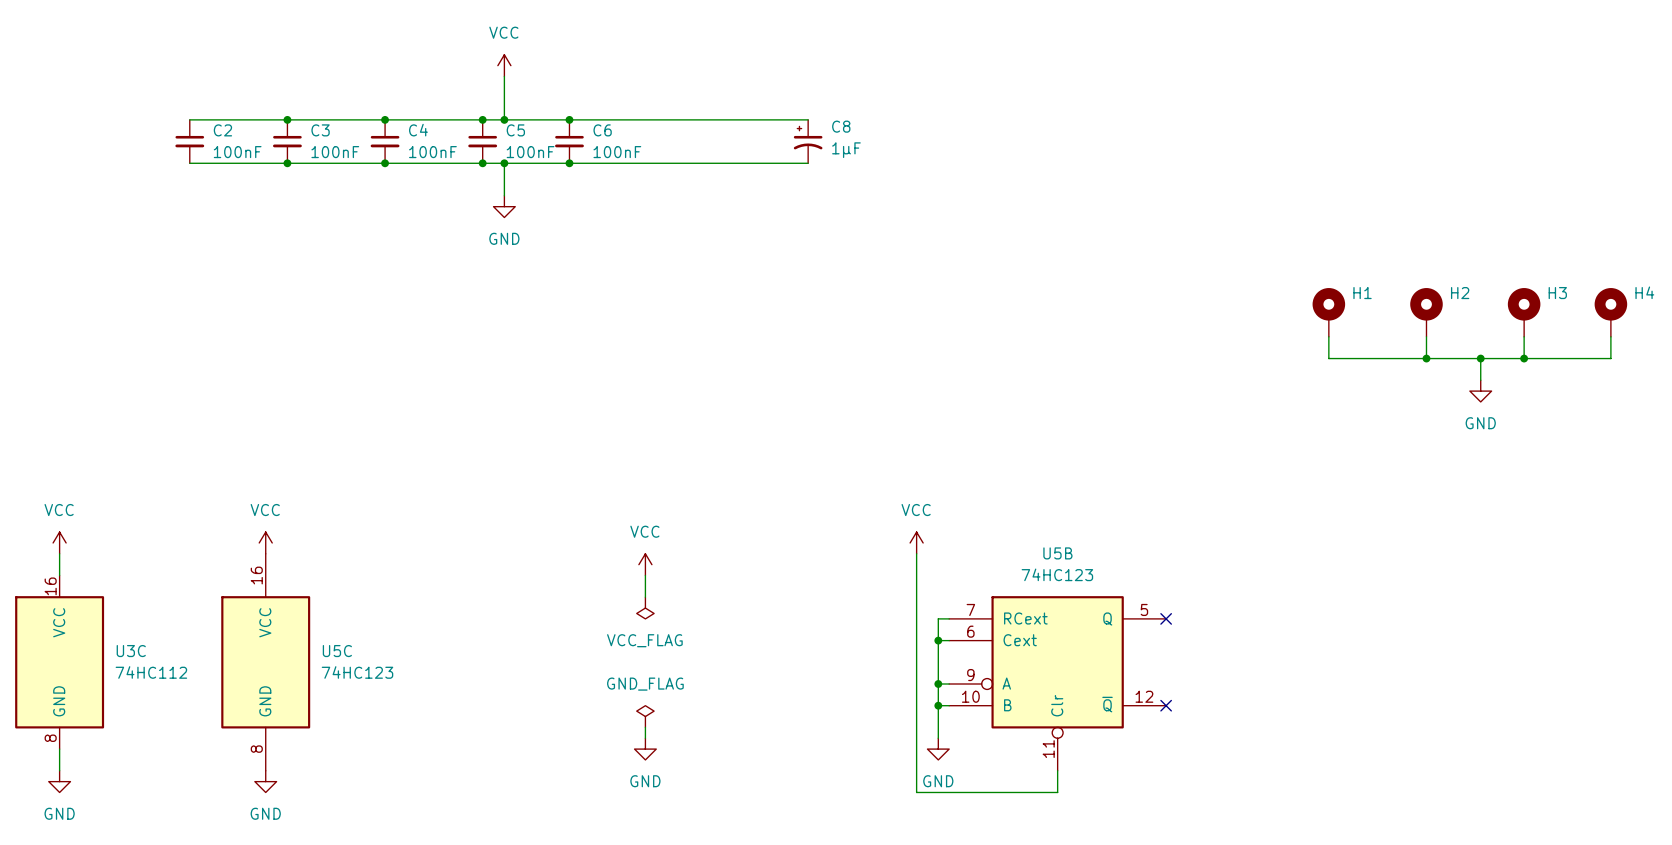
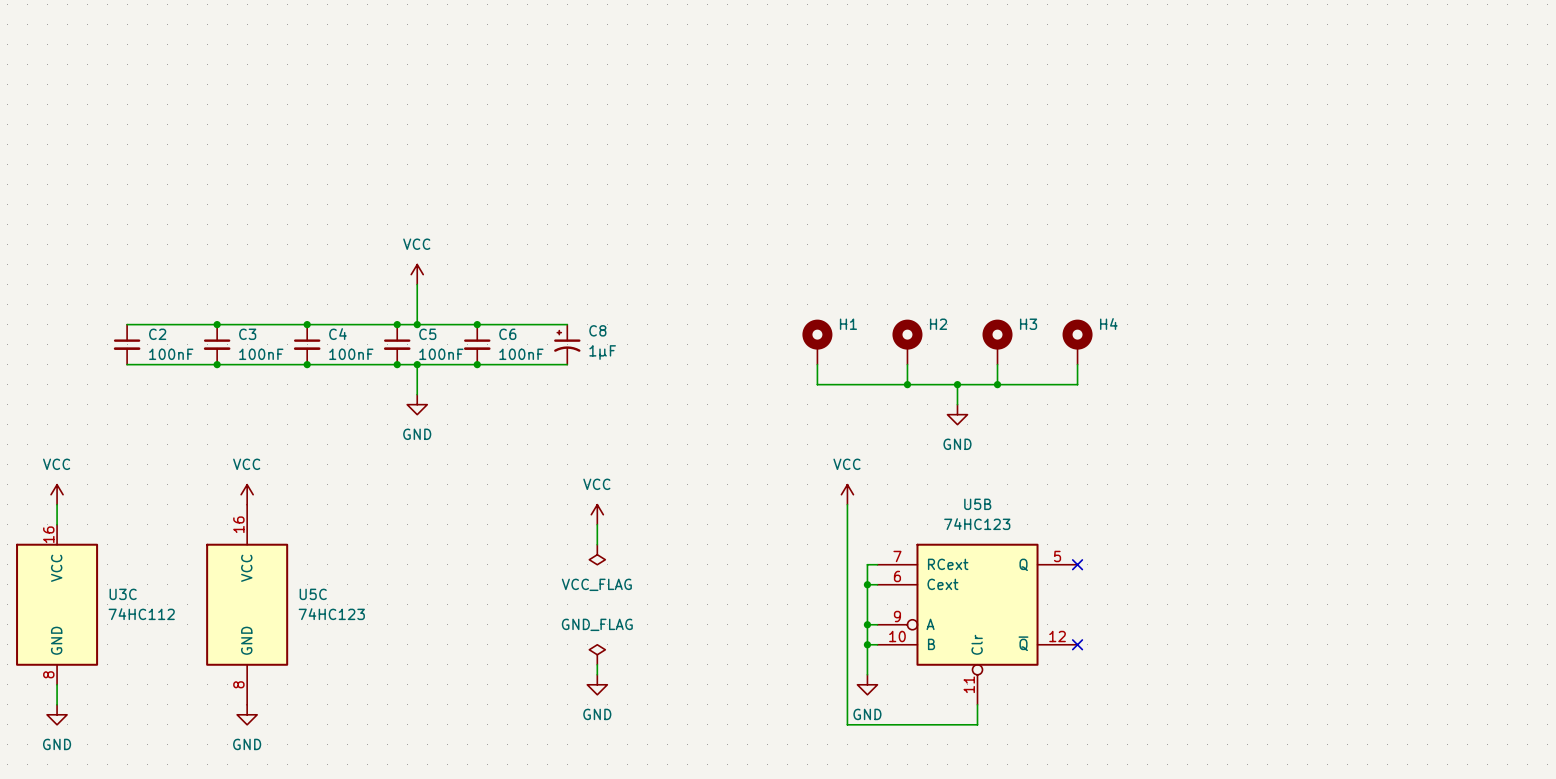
power symbol: VCC (504, 65) -> none
wire: (504, 76) (504, 119) -> none
wire: (189, 119) (808, 119) -> none
junction: (287, 119) -> none
junction: (385, 119) -> none
junction: (482, 119) -> none
junction: (504, 119) -> none
junction: (569, 119) -> none
C2 position: (189, 141) -> (127, 344)
C3 position: (287, 141) -> (217, 344)
C4 position: (385, 141) -> (307, 344)
C5 position: (482, 141) -> (397, 344)
C6 position: (569, 141) -> (477, 344)
C8 position: (808, 141) -> (567, 344)
wire: (189, 163) (808, 163) -> none
junction: (287, 163) -> none
junction: (385, 163) -> none
junction: (482, 163) -> none
wire: (504, 163) (504, 195) -> none
junction: (504, 163) -> none
junction: (569, 163) -> none
power symbol: GND (504, 206) -> none
power symbol: none -> VCC (417, 274)
H1 position: (1328, 312) -> (817, 342)
H2 position: (1426, 312) -> (907, 342)
H3 position: (1524, 312) -> (997, 342)
H4 position: (1610, 312) -> (1077, 342)
wire: none -> (417, 284) (417, 324)
wire: (1328, 336) (1328, 358) (1610, 358) (1610, 336) -> none
wire: (1426, 336) (1426, 358) -> none
wire: (1524, 336) (1524, 358) -> none
wire: none -> (127, 324) (567, 324)
junction: none -> (217, 324)
junction: none -> (307, 324)
junction: none -> (397, 324)
junction: none -> (417, 324)
junction: none -> (477, 324)
junction: (1426, 358) -> none
wire: (1480, 358) (1480, 380) -> none
junction: (1480, 358) -> none
junction: (1524, 358) -> none
power symbol: GND (1480, 391) -> none
wire: none -> (127, 364) (567, 364)
junction: none -> (217, 364)
junction: none -> (307, 364)
junction: none -> (397, 364)
wire: none -> (417, 364) (417, 394)
junction: none -> (417, 364)
junction: none -> (477, 364)
wire: none -> (817, 364) (817, 384) (1077, 384) (1077, 364)
wire: none -> (907, 364) (907, 384)
wire: none -> (997, 364) (997, 384)
junction: none -> (907, 384)
wire: none -> (957, 384) (957, 404)
junction: none -> (957, 384)
junction: none -> (997, 384)
power symbol: none -> GND (417, 404)
power symbol: none -> GND (957, 414)

